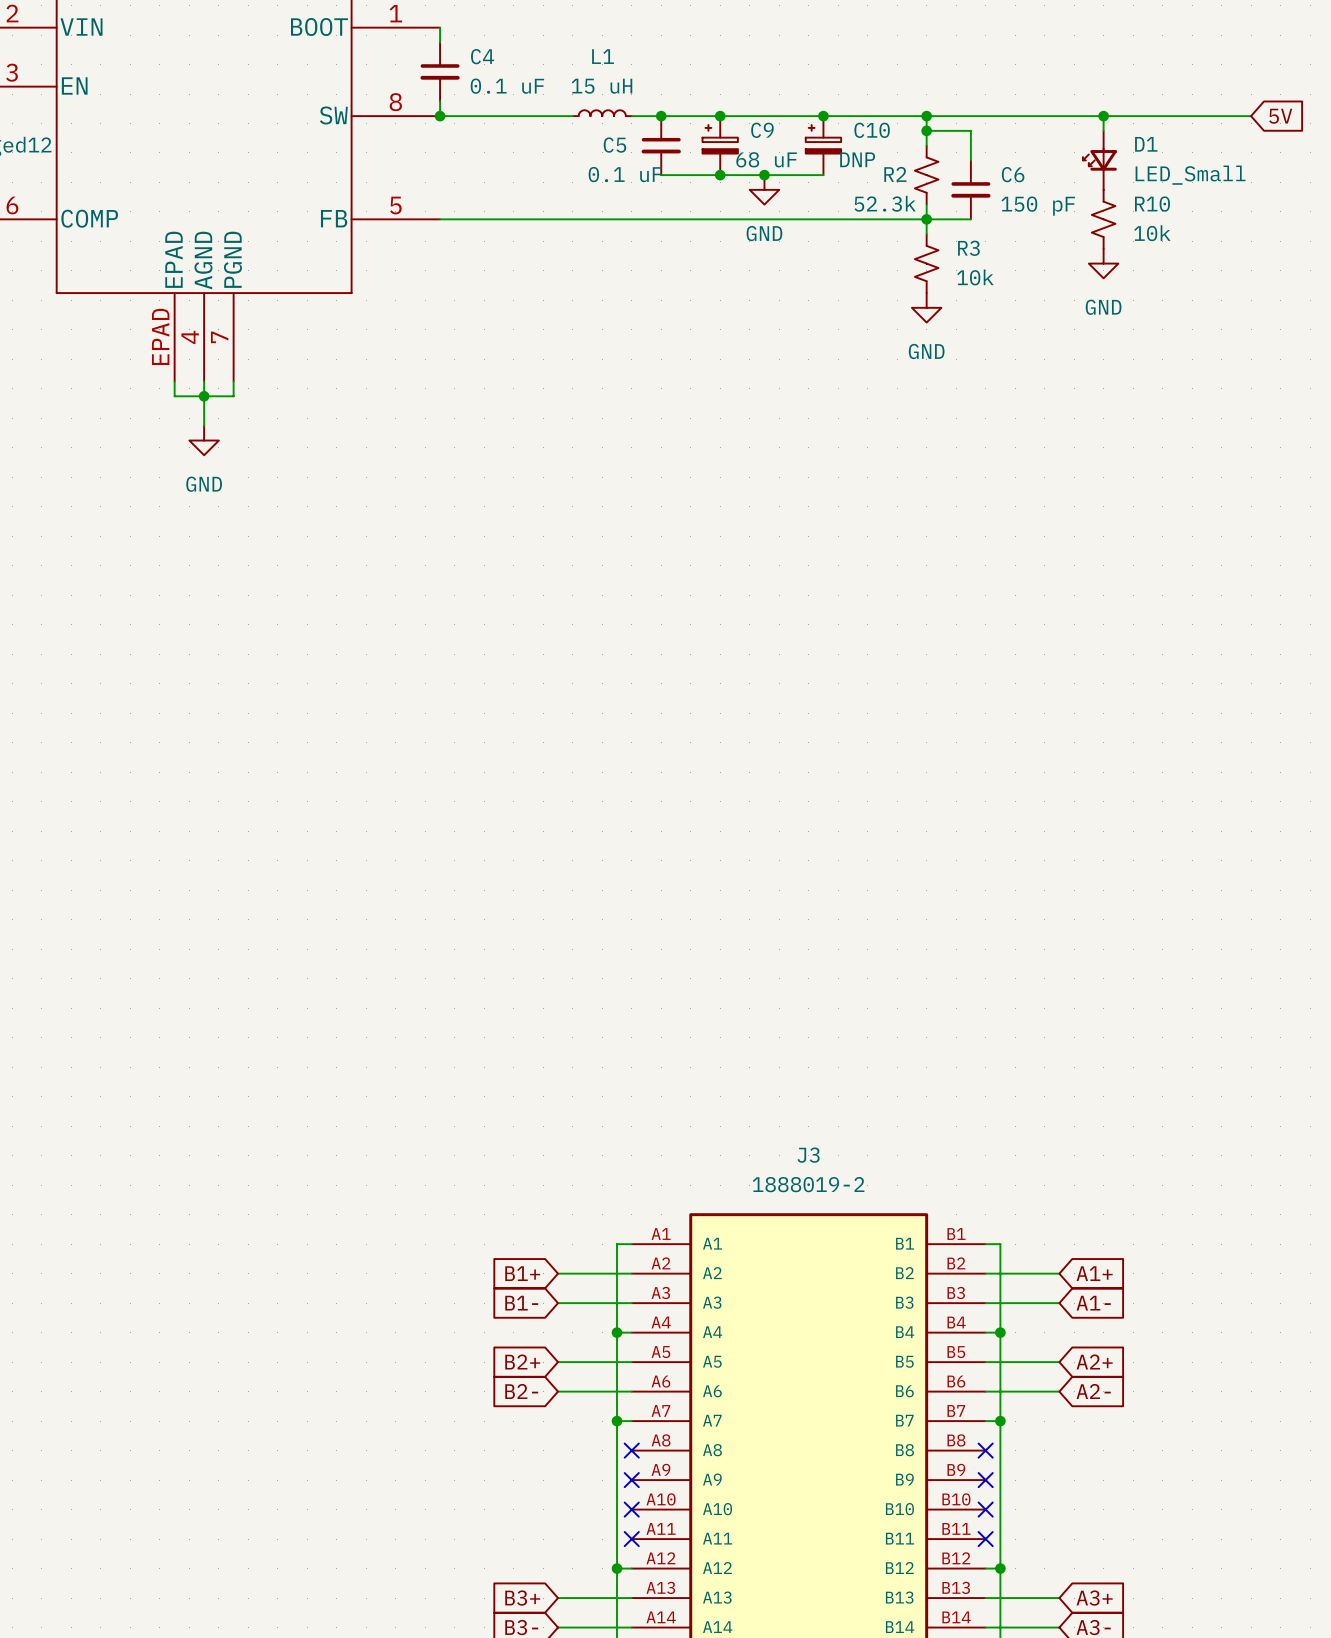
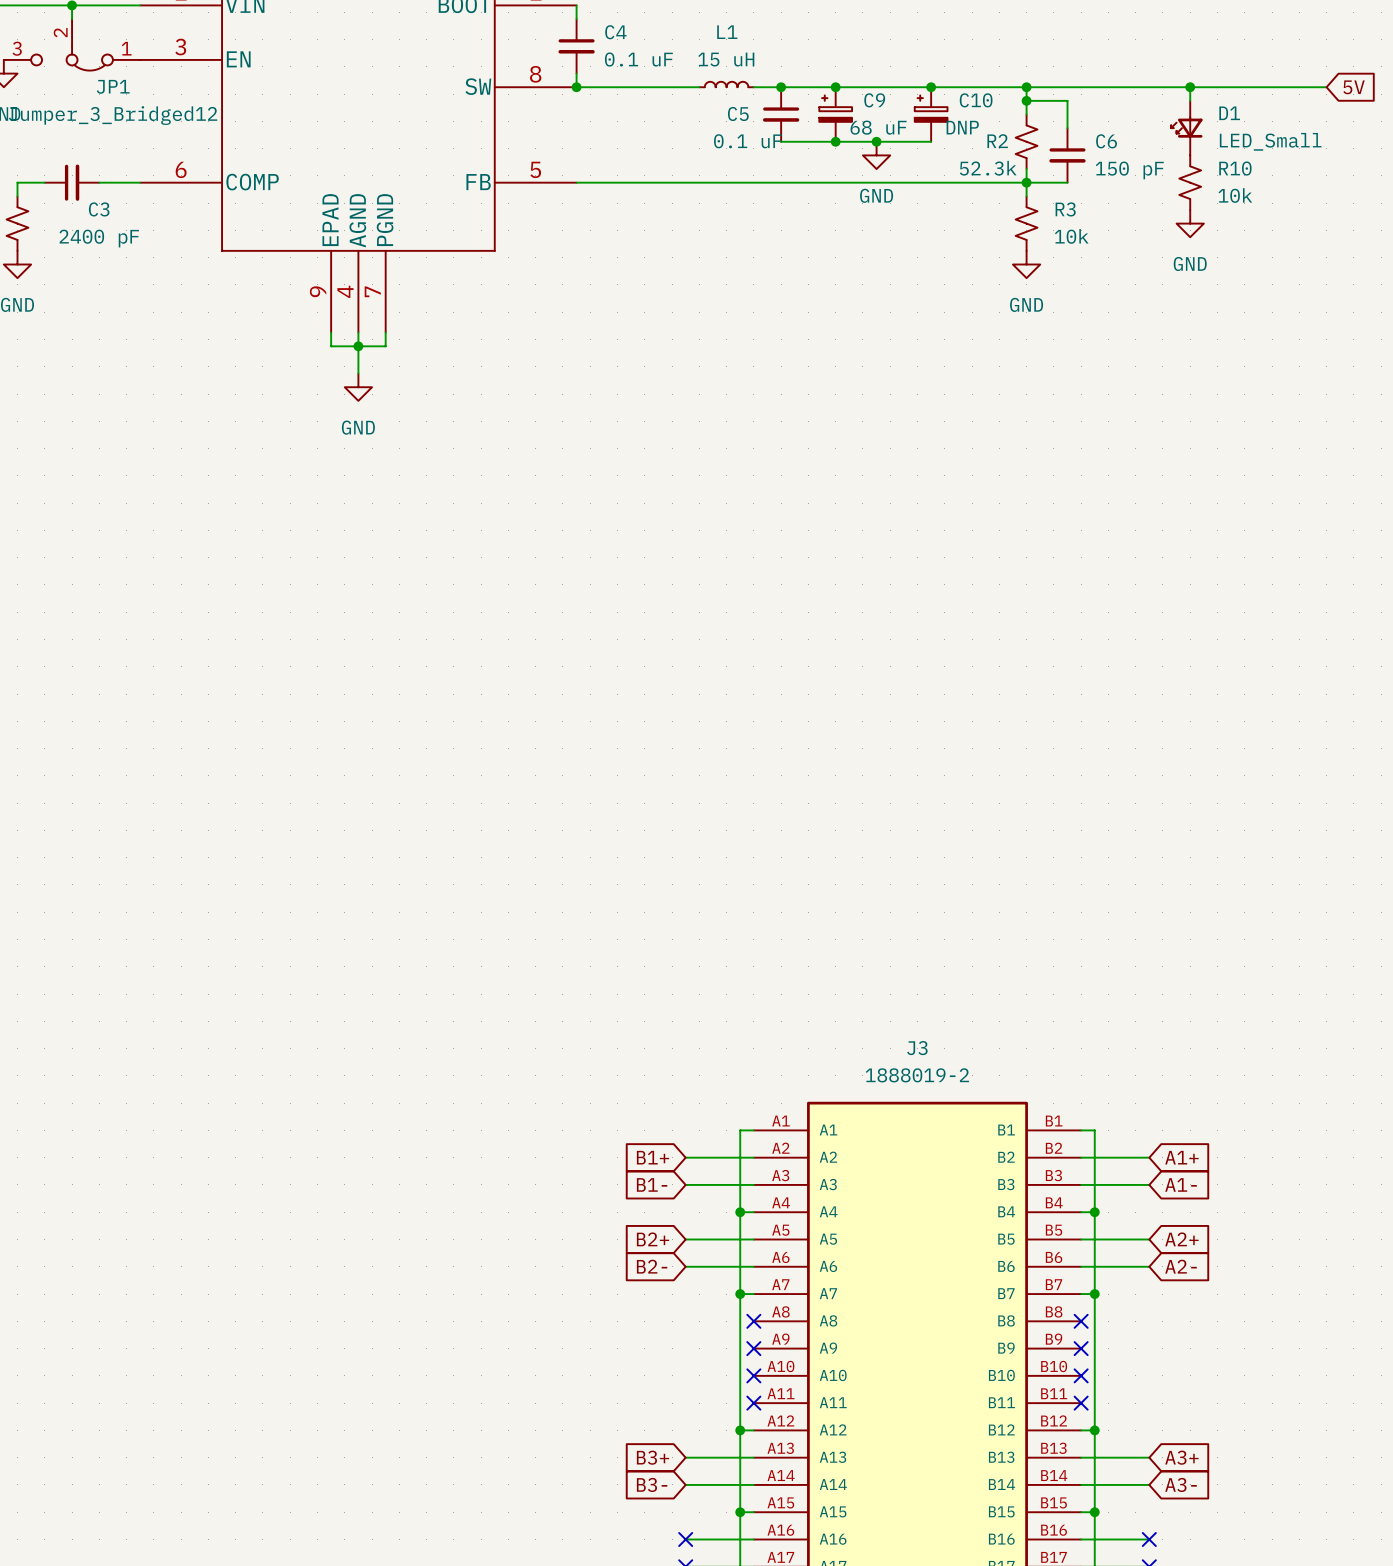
part pin number: EPAD (160, 336) -> 9 (318, 291)

